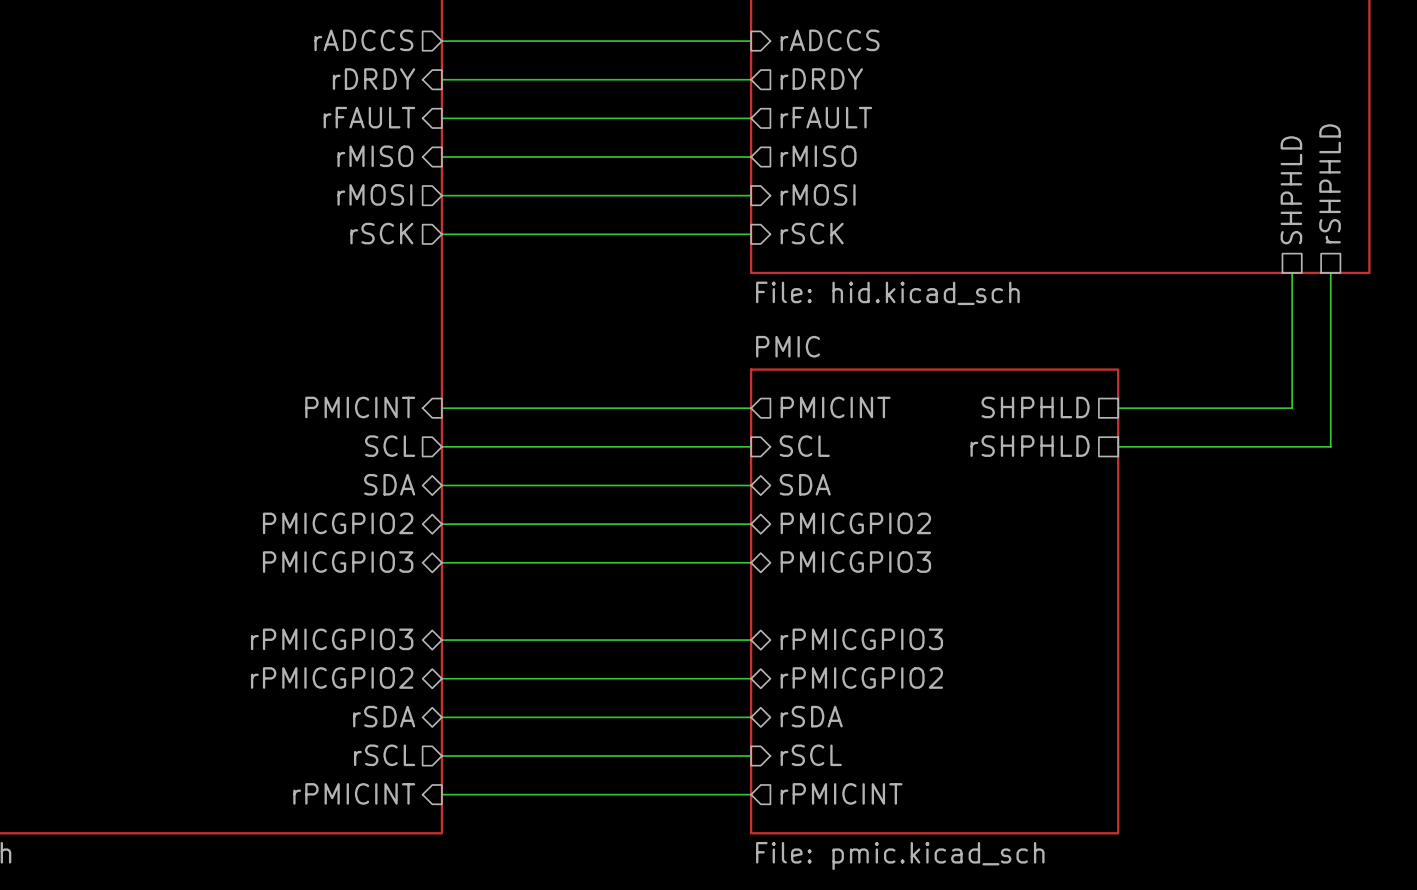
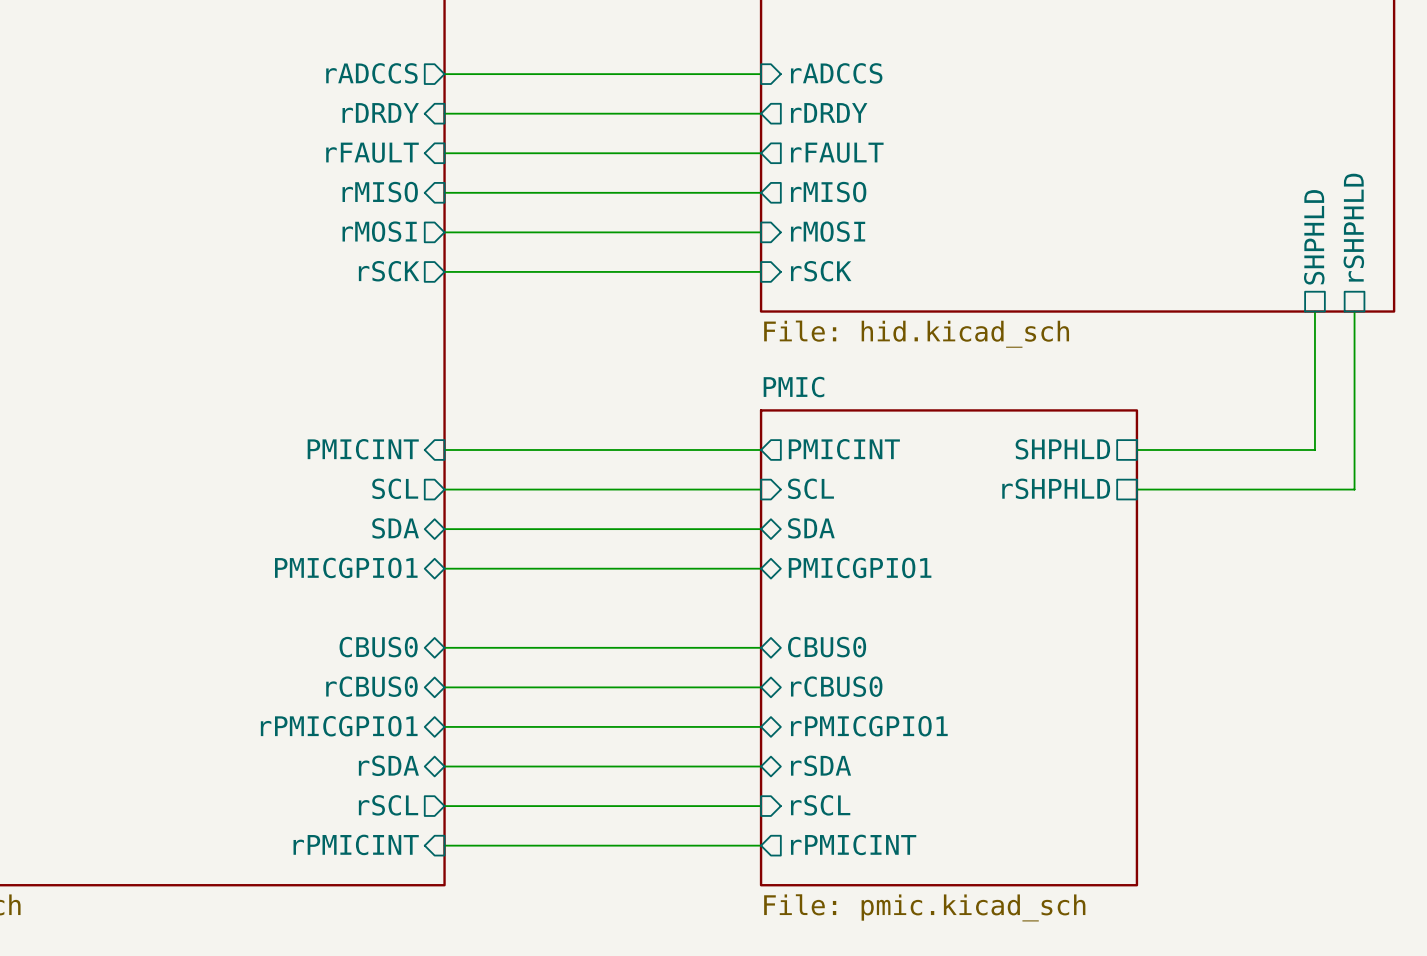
sheet pin: PMICGPIO2 (338, 523) -> PMICGPIO1 (346, 567)
sheet pin: PMICGPIO2 (855, 523) -> PMICGPIO1 (860, 567)
sheet pin: PMICGPIO3 (338, 562) -> none
wire: (441, 562) (751, 562) -> (444, 647) (761, 647)
sheet pin: PMICGPIO3 (855, 562) -> none
sheet pin: none -> CBUS0 (378, 647)
sheet pin: none -> CBUS0 (827, 647)
sheet pin: rPMICGPIO3 (332, 639) -> rCBUS0 (371, 686)
sheet pin: rPMICGPIO3 (861, 639) -> rCBUS0 (836, 686)
sheet pin: rPMICGPIO2 (332, 677) -> rPMICGPIO1 (339, 726)
sheet pin: rPMICGPIO2 (861, 677) -> rPMICGPIO1 (869, 726)

